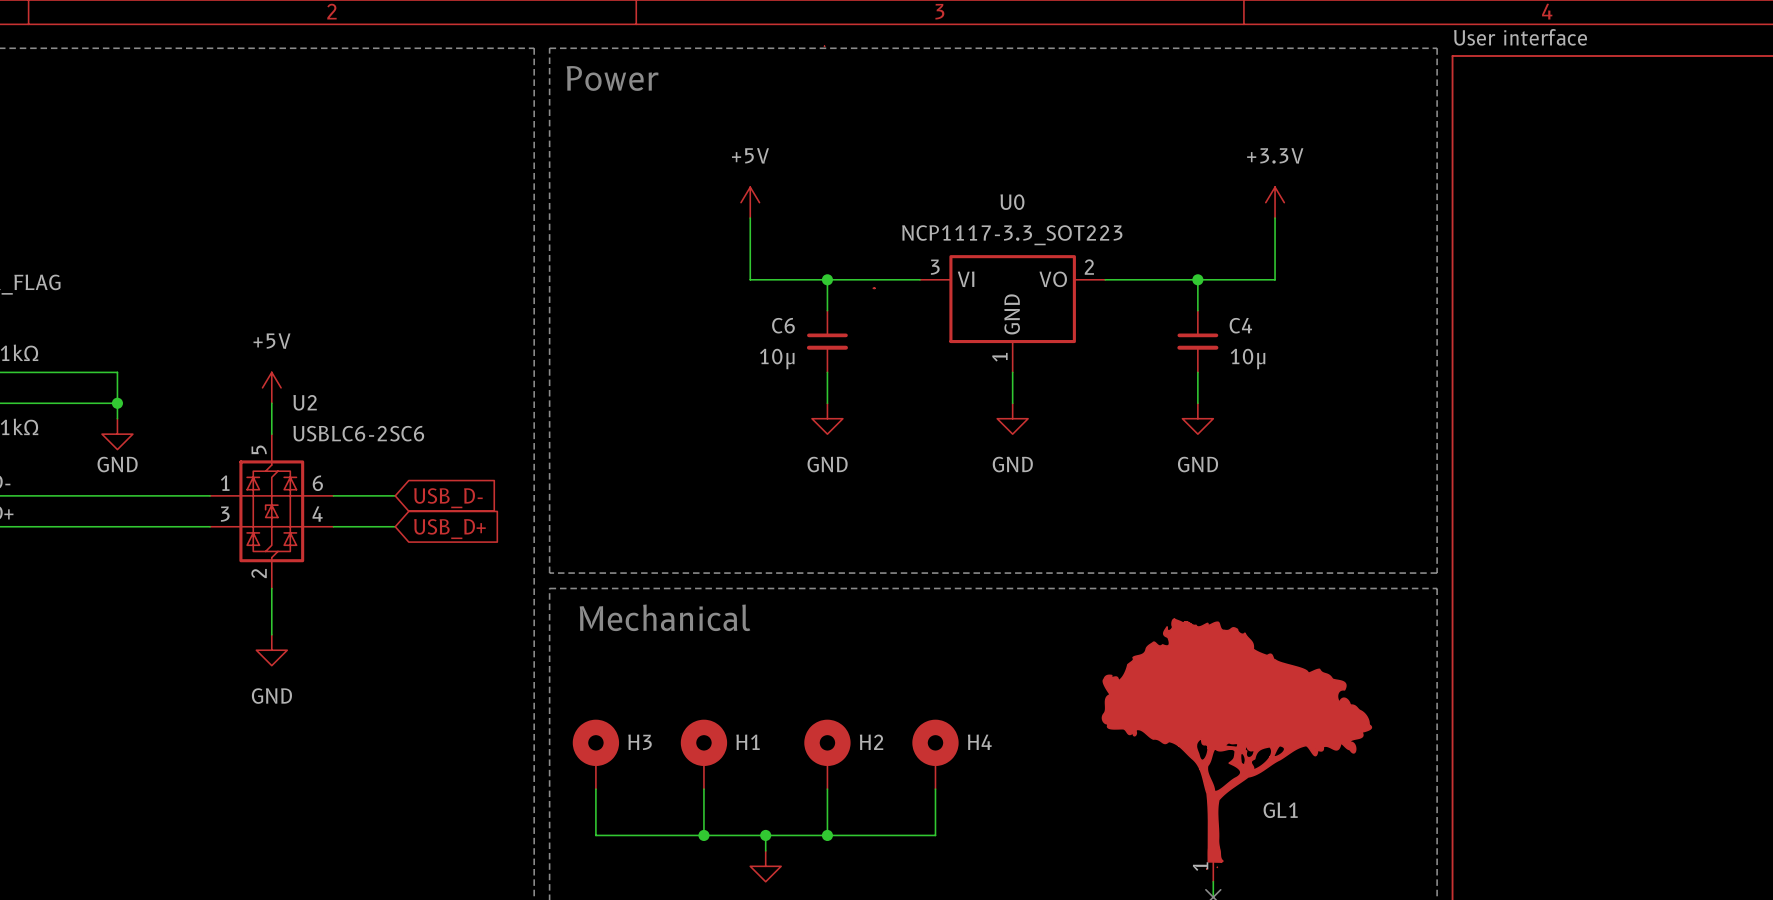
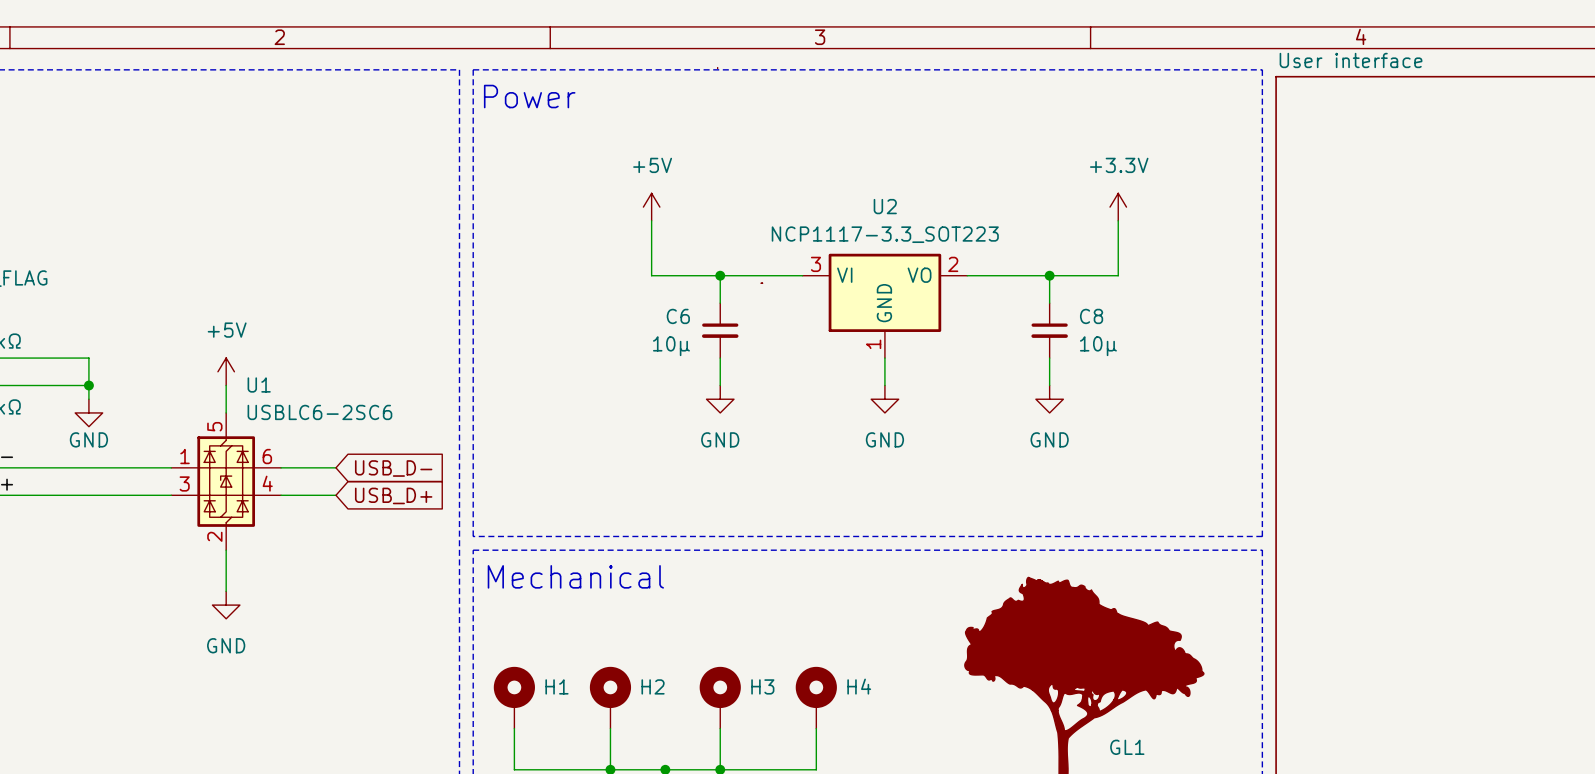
U0 name: U0 (1012, 202) -> U2 (885, 206)
C4 name: C4 (1240, 325) -> C8 (1091, 316)
U2 name: U2 (305, 402) -> U1 (259, 384)
H3 name: H3 (640, 742) -> H1 (556, 686)
H1 name: H1 (748, 742) -> H2 (653, 686)
H2 name: H2 (871, 742) -> H3 (762, 686)

